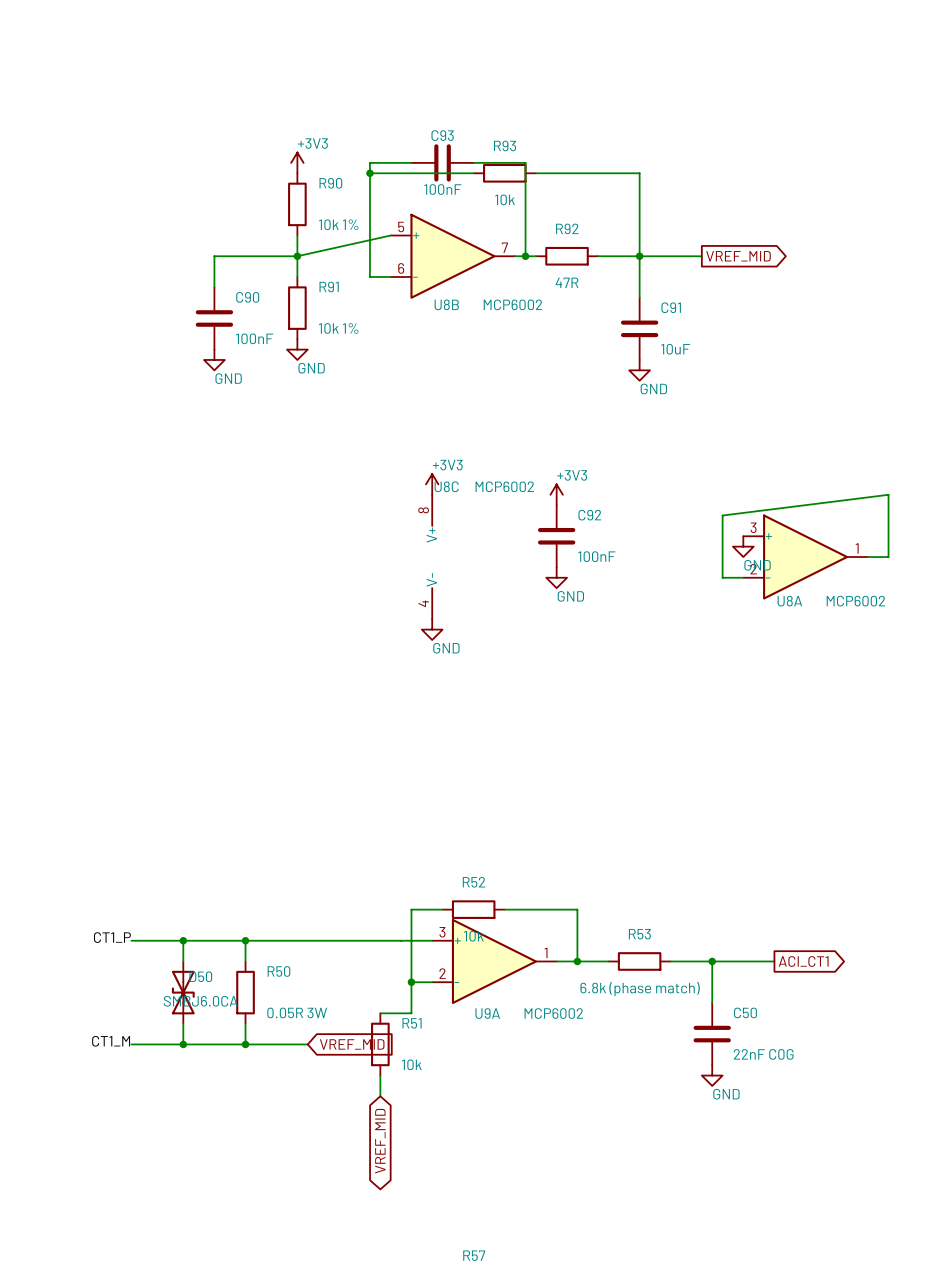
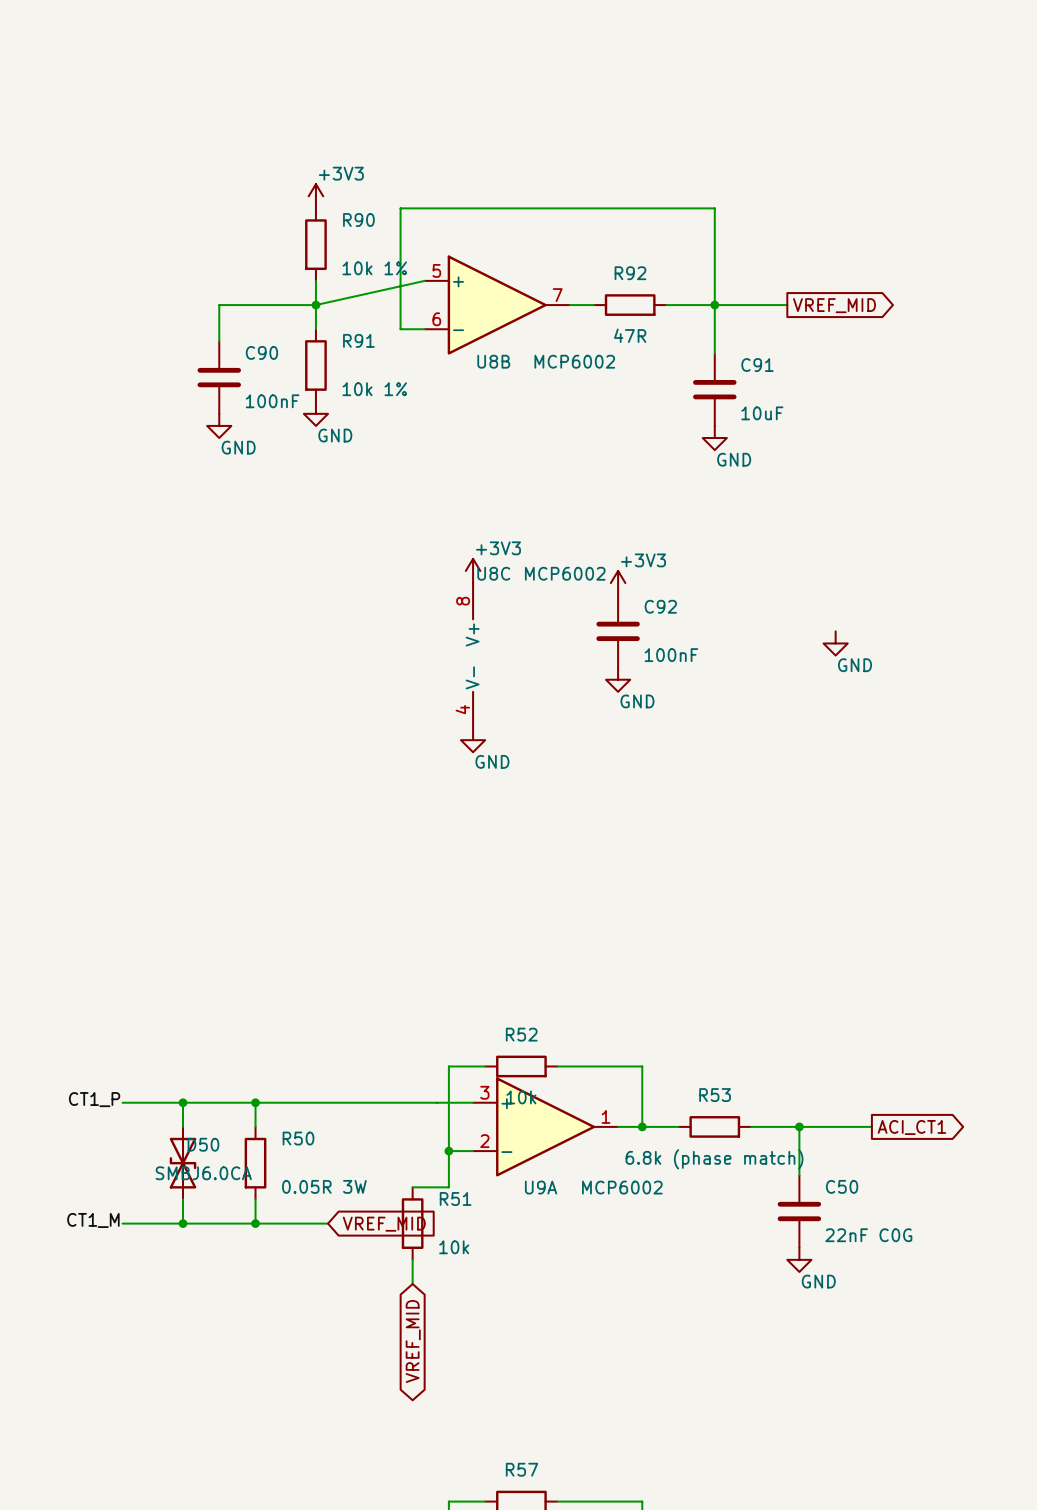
wire: (411, 162) (369, 162) (369, 173) -> none
C93: 100nF (442, 162) -> none
wire: (473, 162) (525, 162) (525, 256) -> none
junction: (369, 173) -> none
wire: none -> (521, 208) (593, 208)
R93: 10k (504, 173) -> none
junction: (525, 256) -> none
U8A: MCP6002 (805, 557) -> none
wire: (867, 557) (888, 557) (888, 494) (722, 515) (722, 577) (743, 577) -> none

